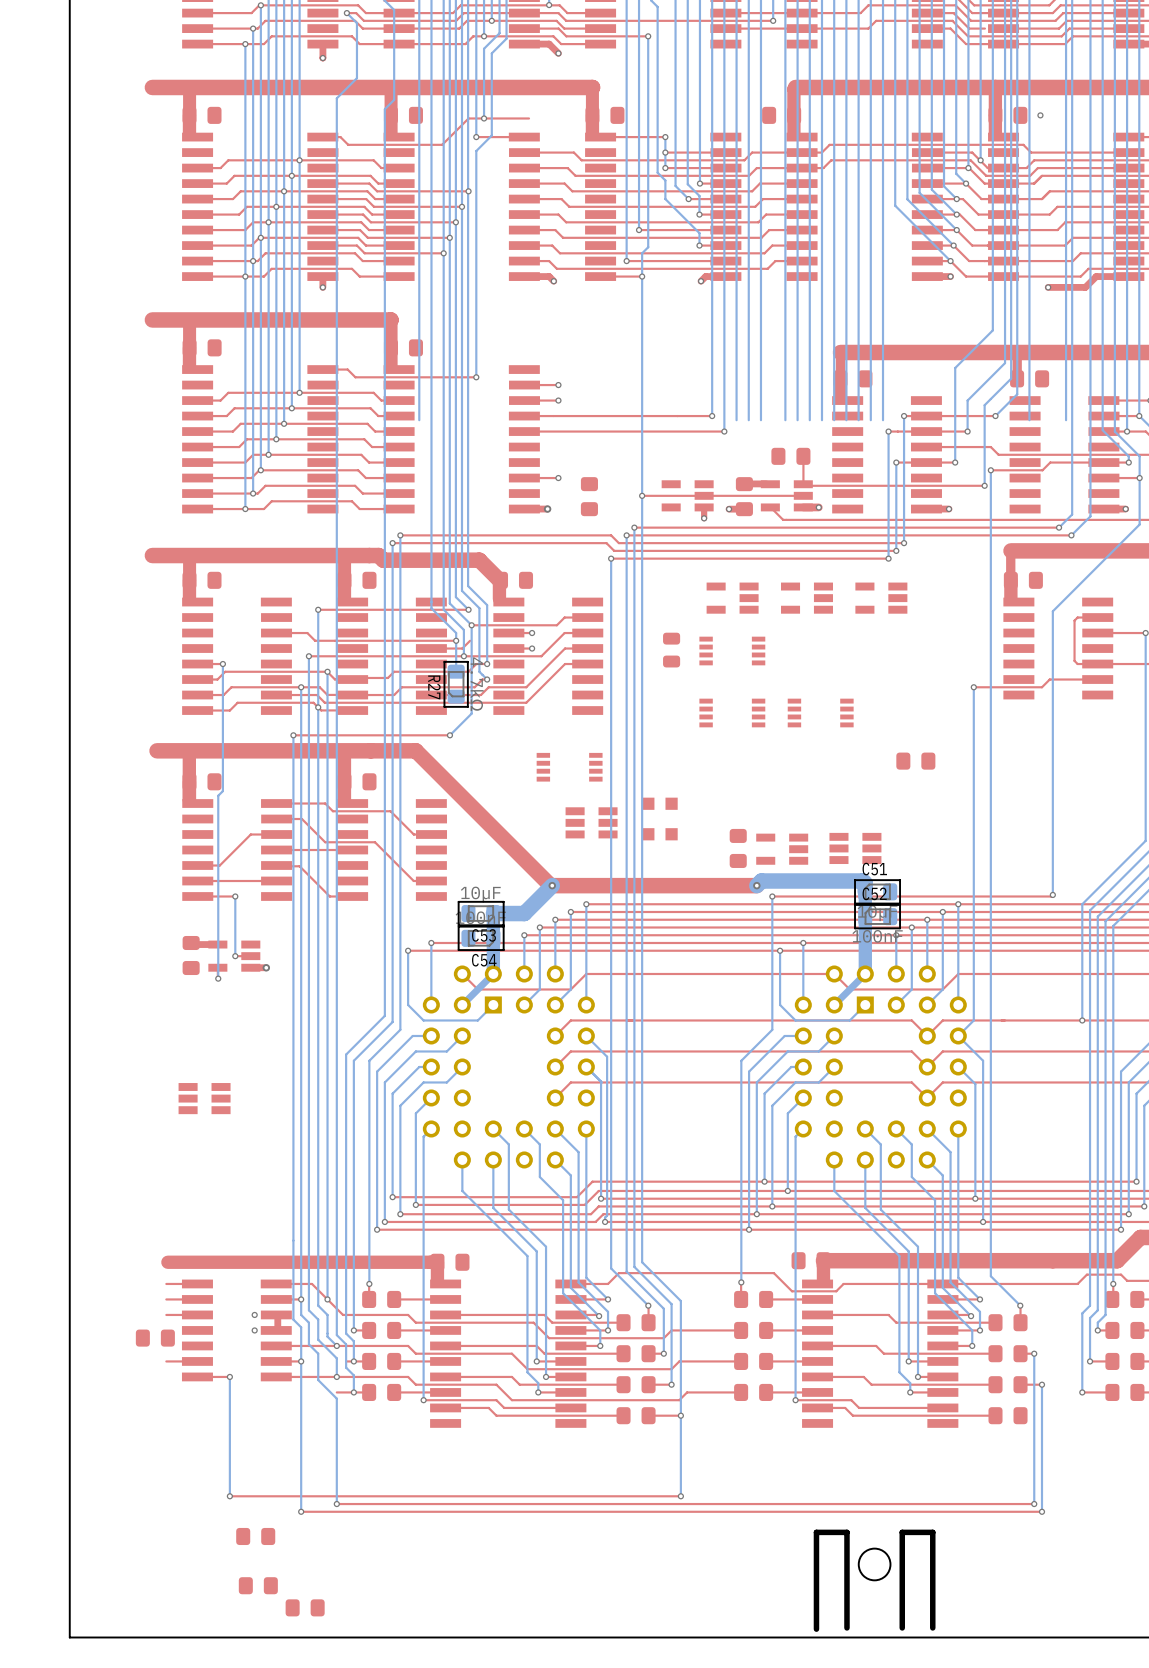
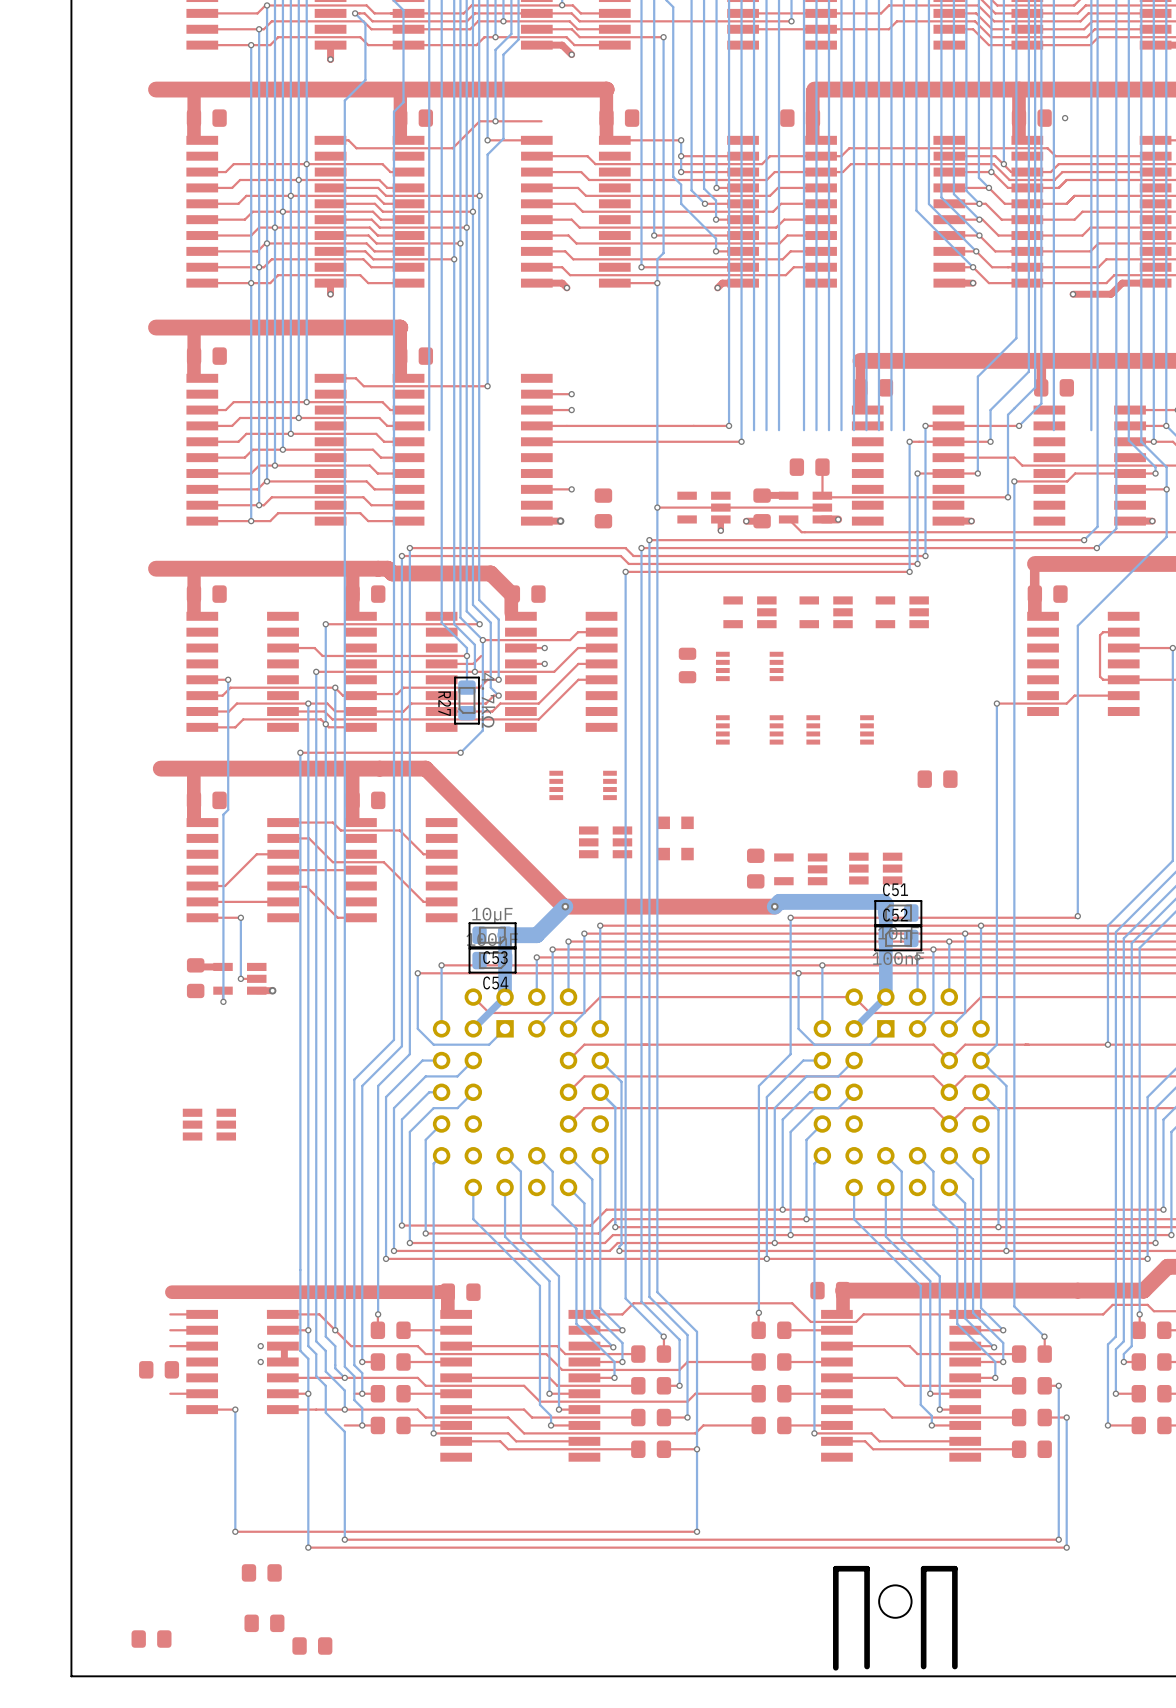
part: none -> (151, 1639)

